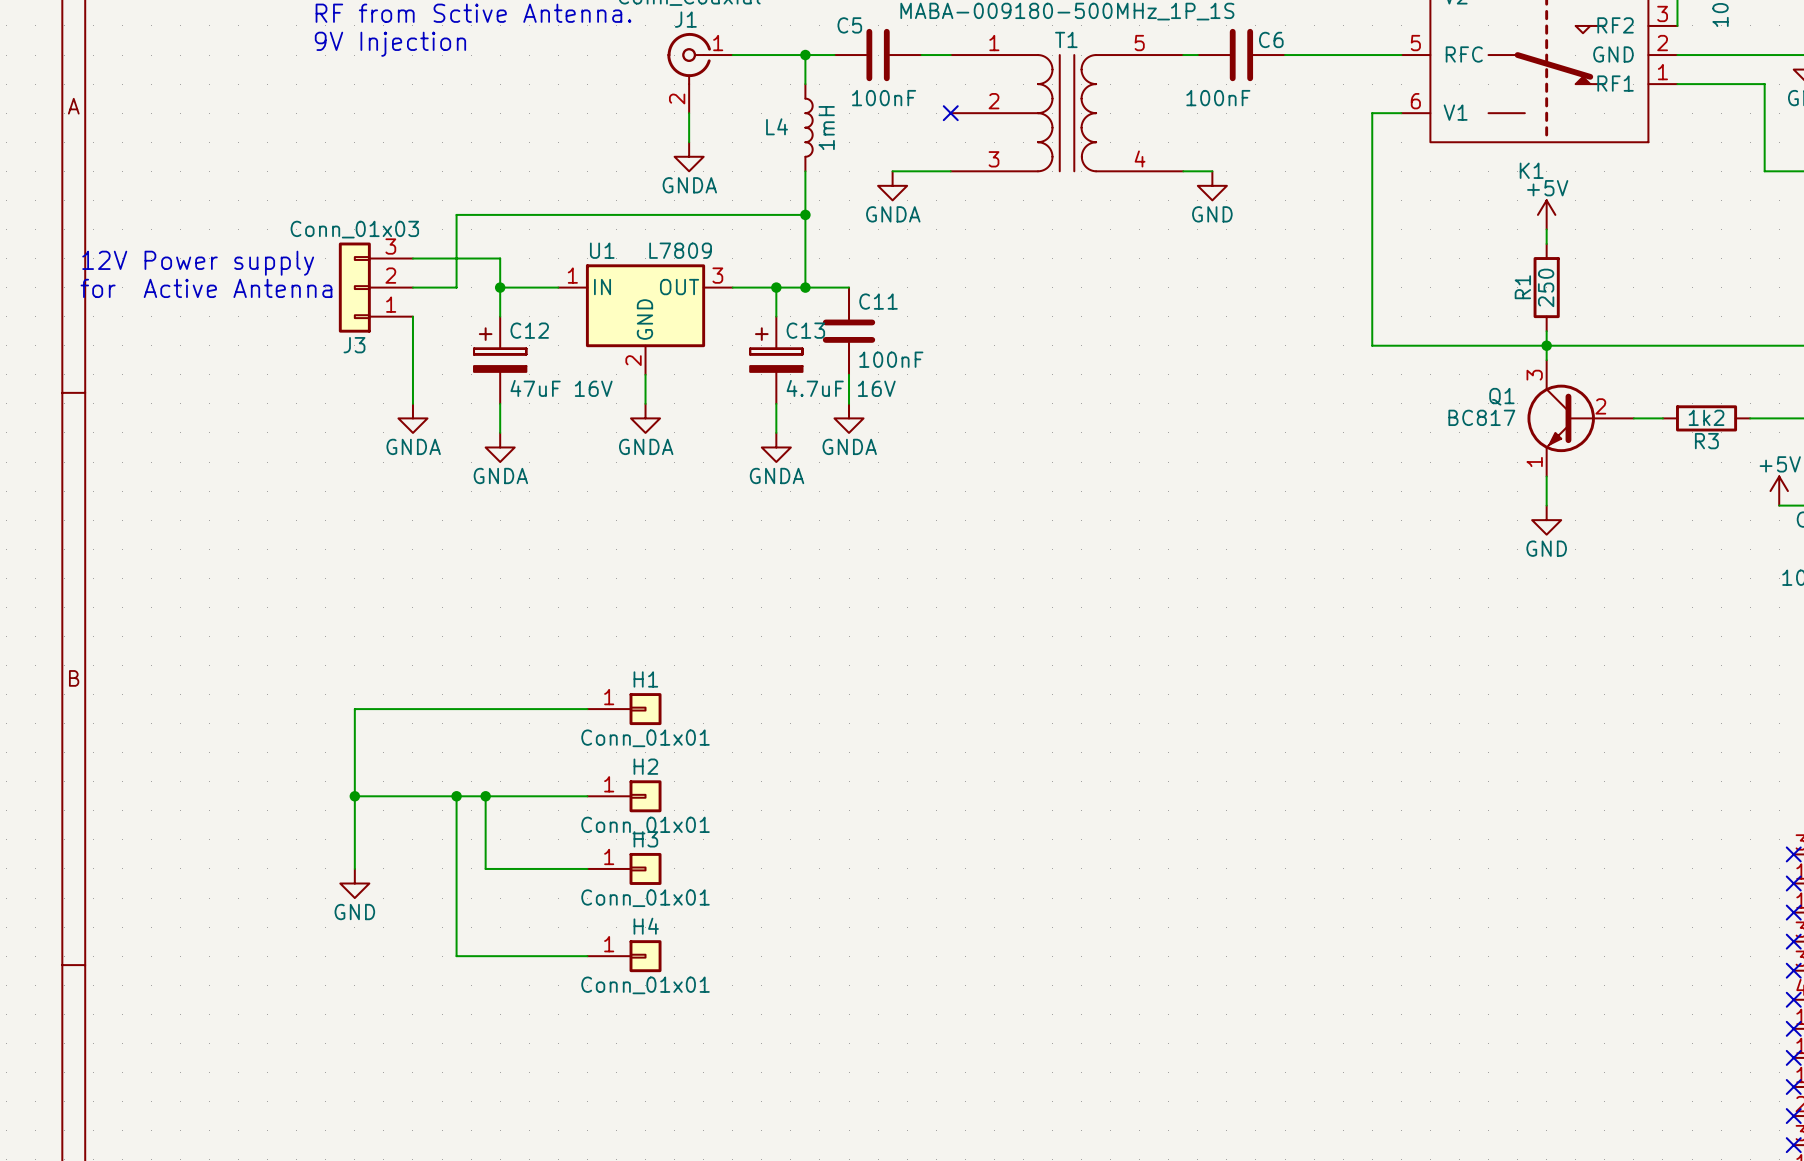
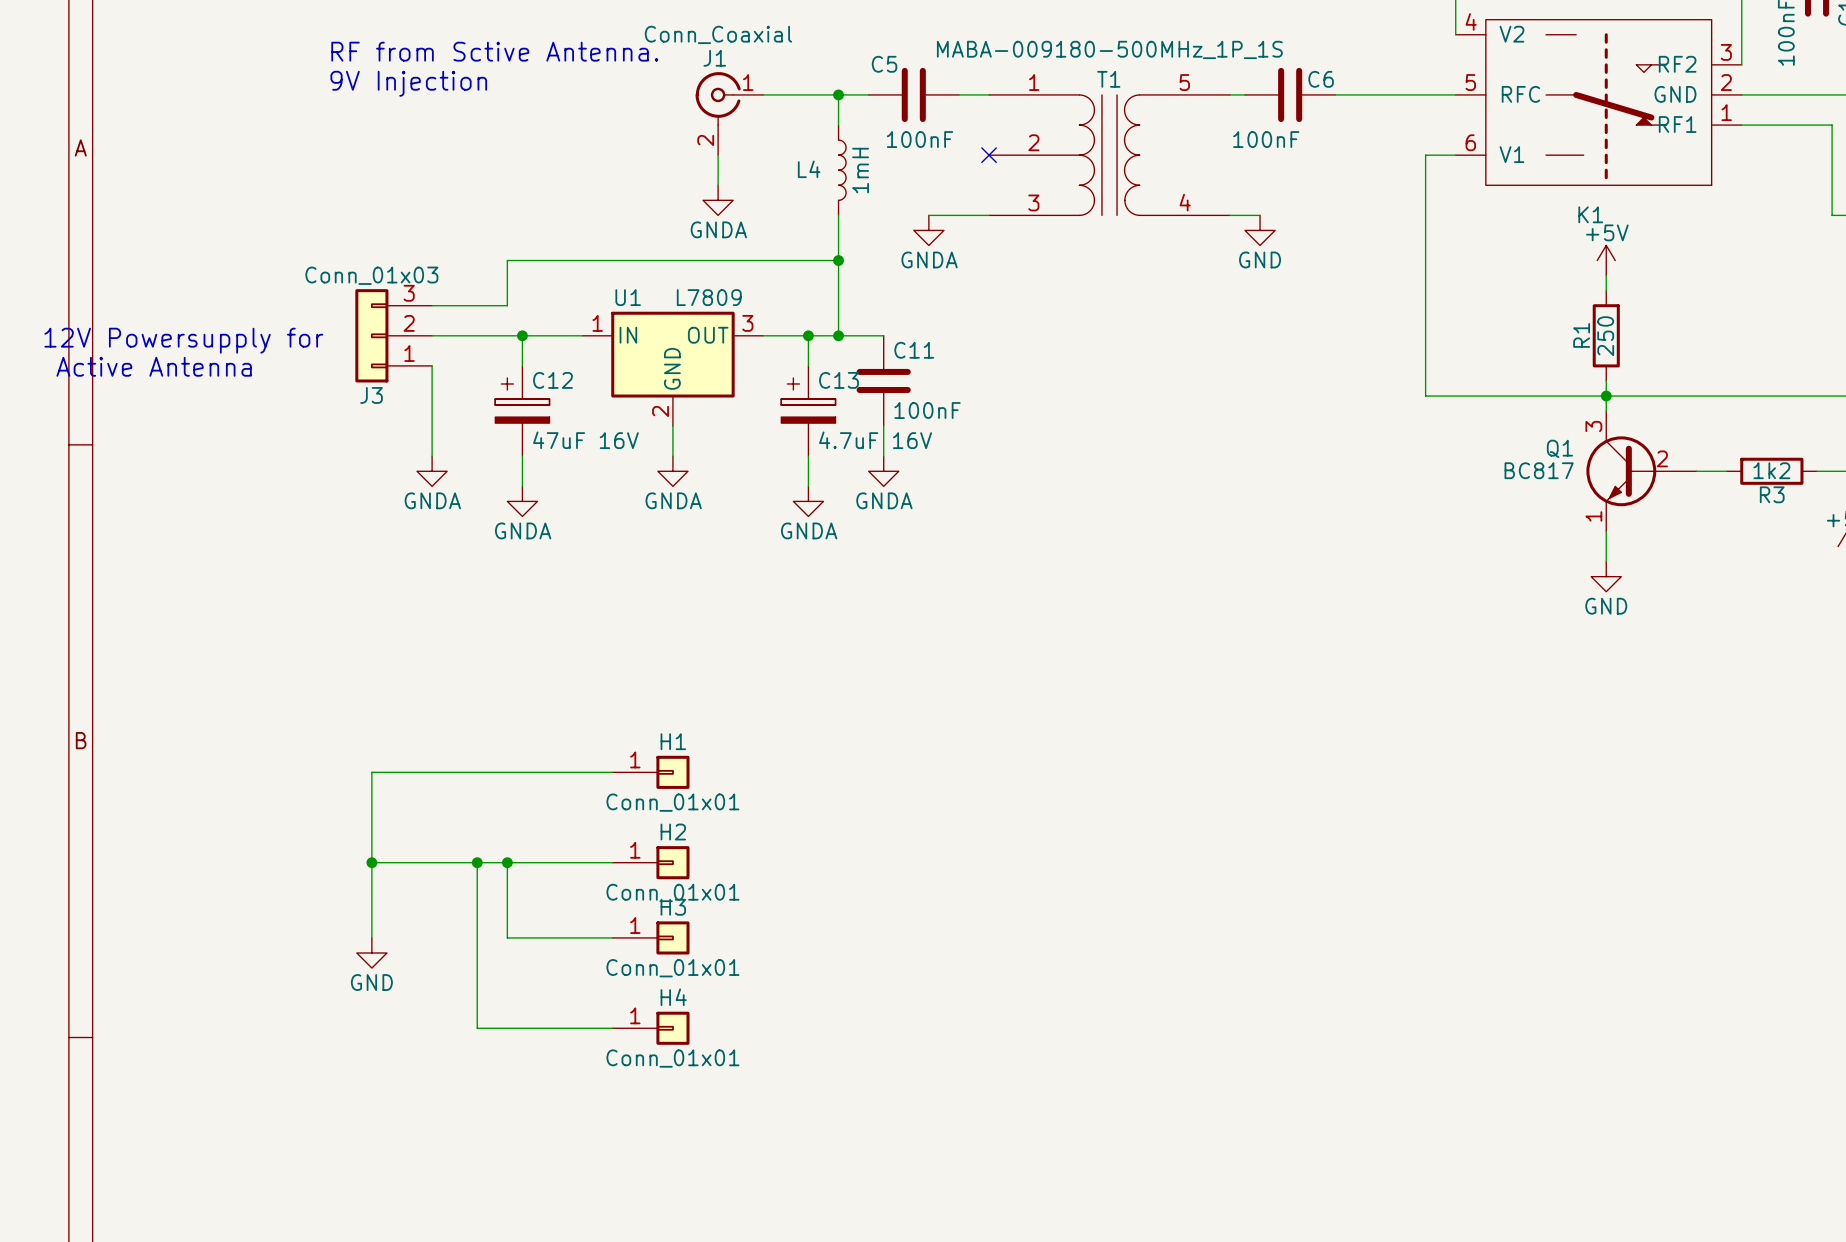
wire: (485, 214) (456, 214) (456, 287) -> (507, 260) (507, 305)
wire: (485, 258) (500, 258) (500, 287) -> (477, 335) (522, 335)
text: 12V Power supply (198, 263) -> 12V Powersupply for (183, 340)
text: for Active Antenna (206, 288) -> Active Antenna (154, 366)

